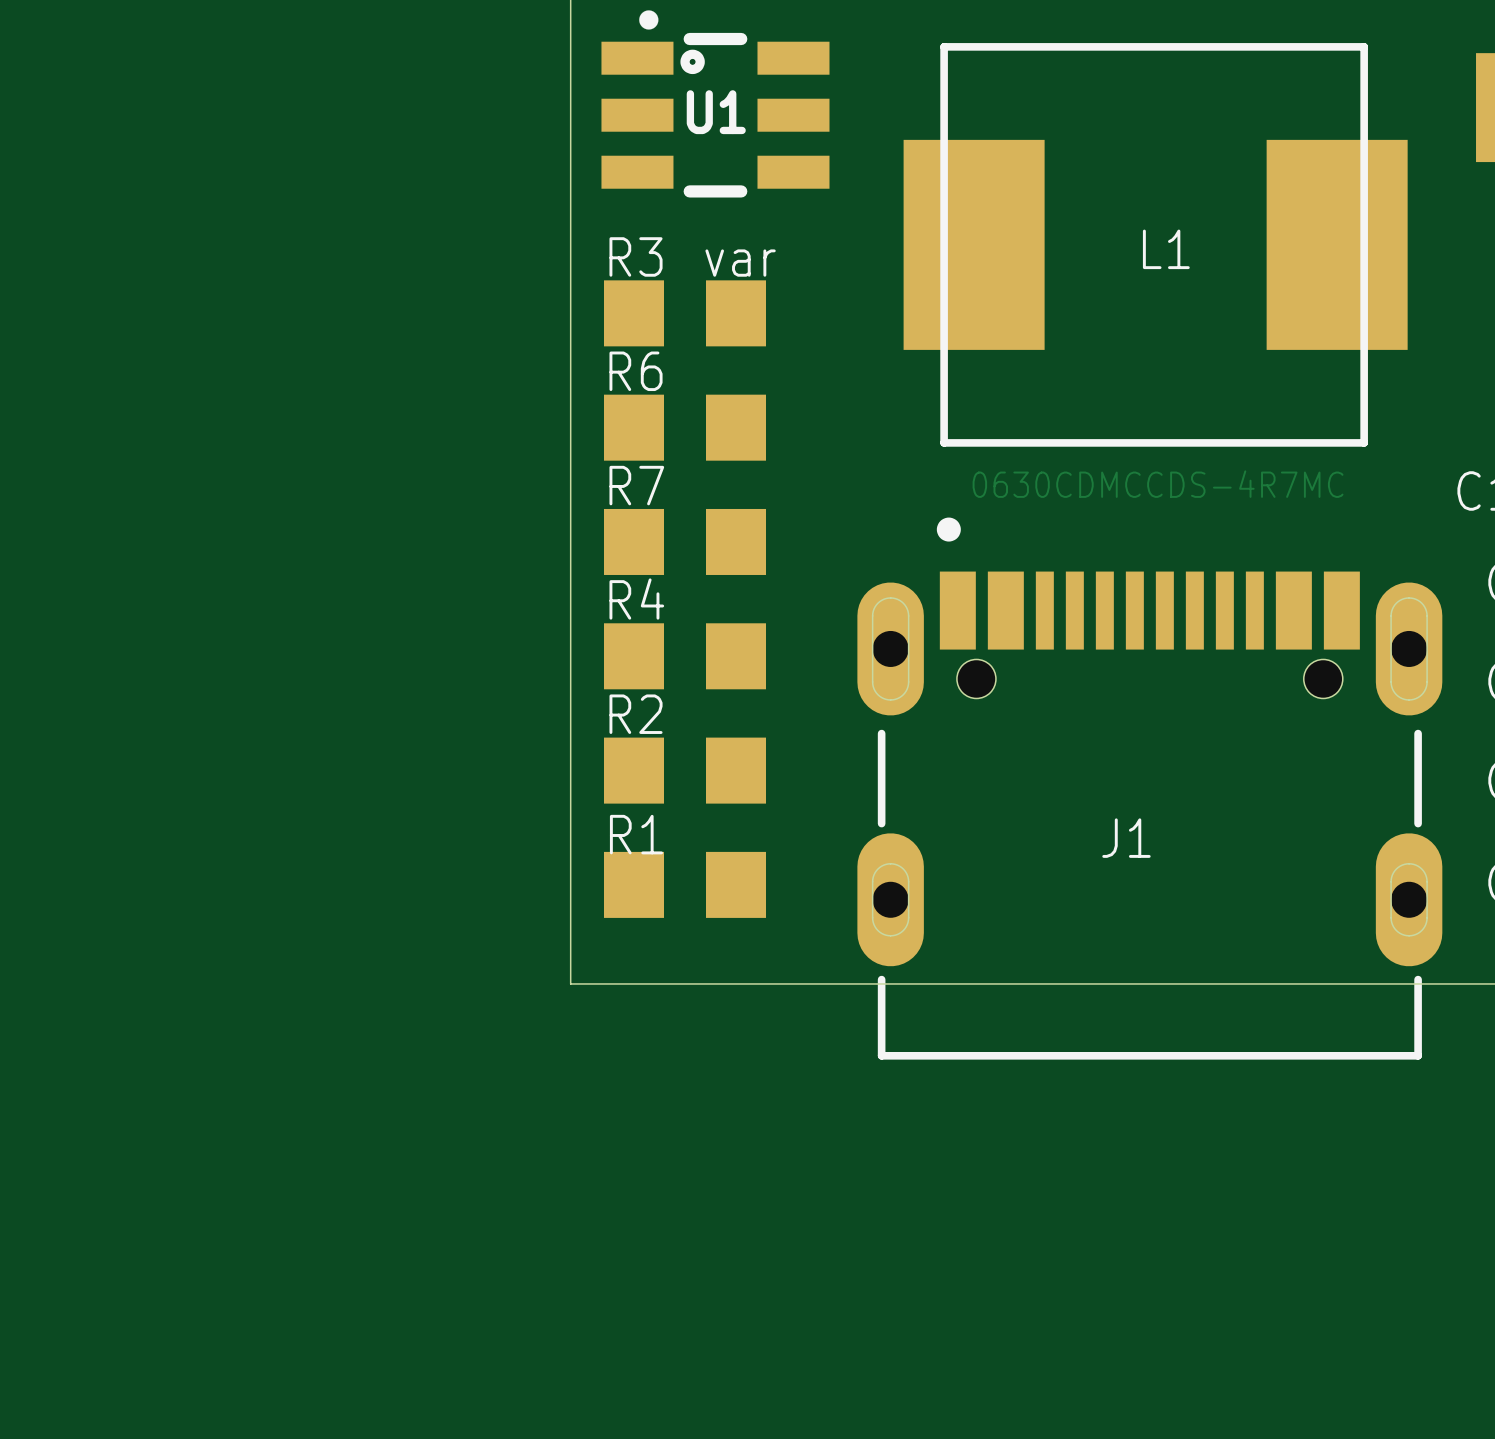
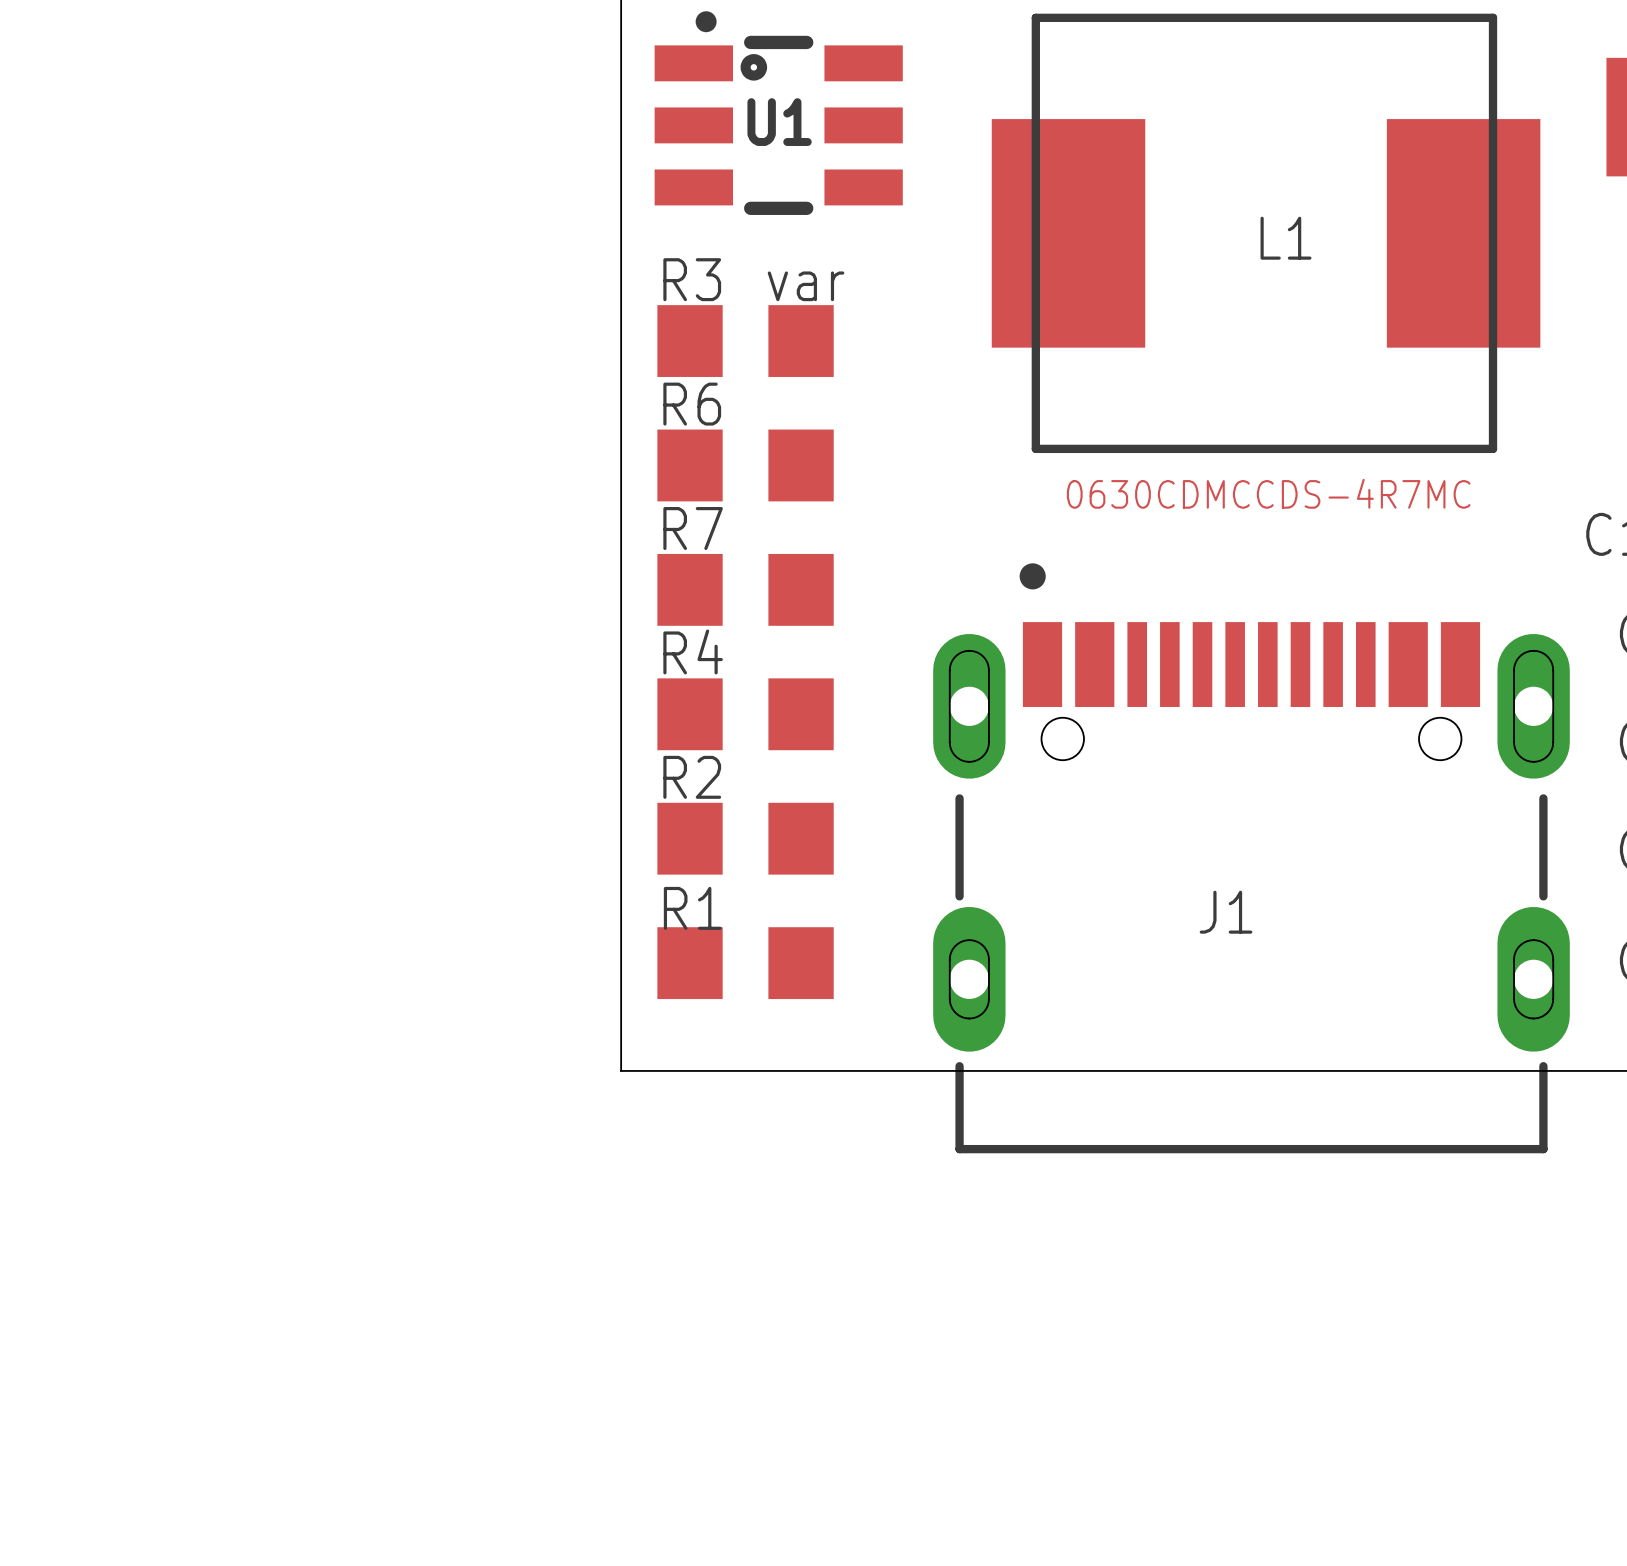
part position: (1155, 244) -> (1266, 233)
text position: L1 (1166, 249) -> L1 (1286, 238)

